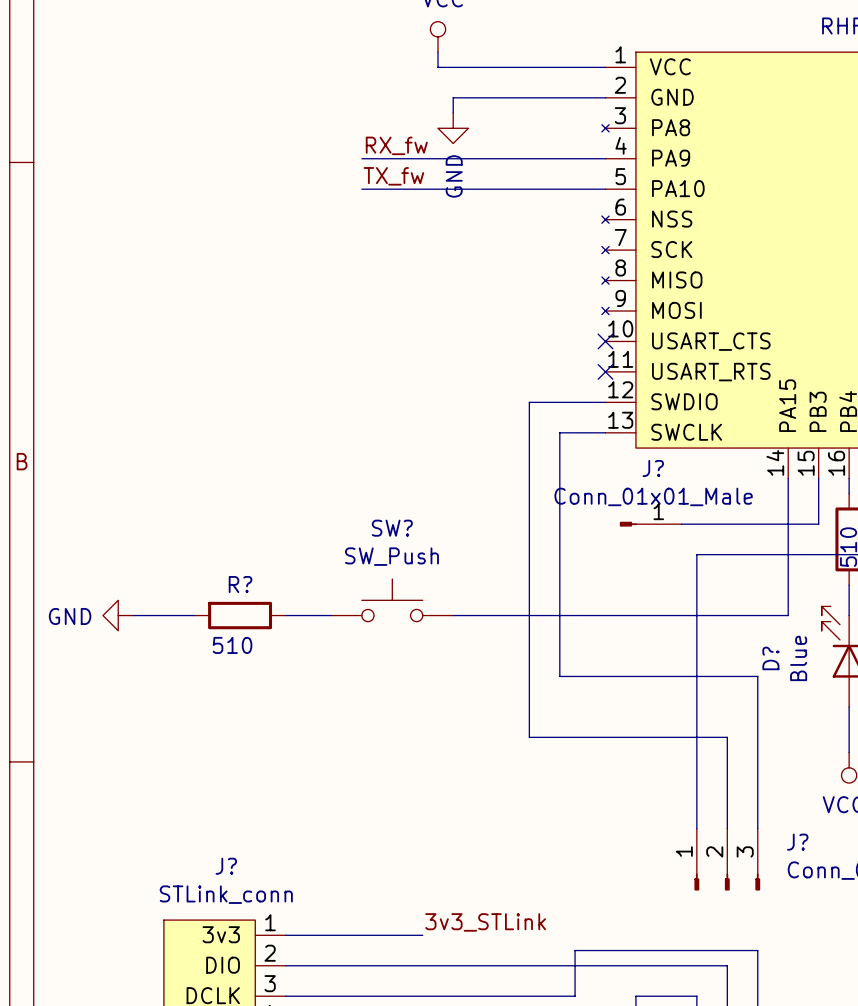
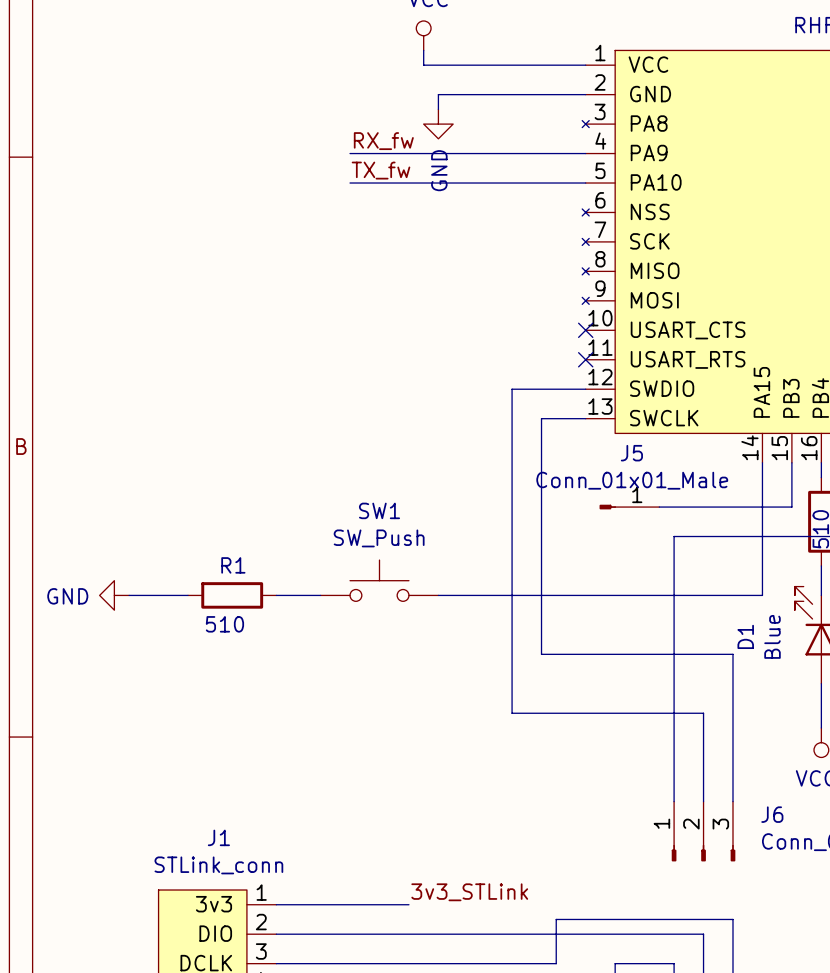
J? name: J? (653, 468) -> J5 (631, 453)
SW? name: SW? (392, 528) -> SW1 (379, 510)
R? name: R? (240, 584) -> R1 (233, 565)
D? name: D? (770, 658) -> D1 (745, 636)
J? name: J? (797, 842) -> J6 (772, 814)
J? name: J? (226, 866) -> J1 (218, 837)

